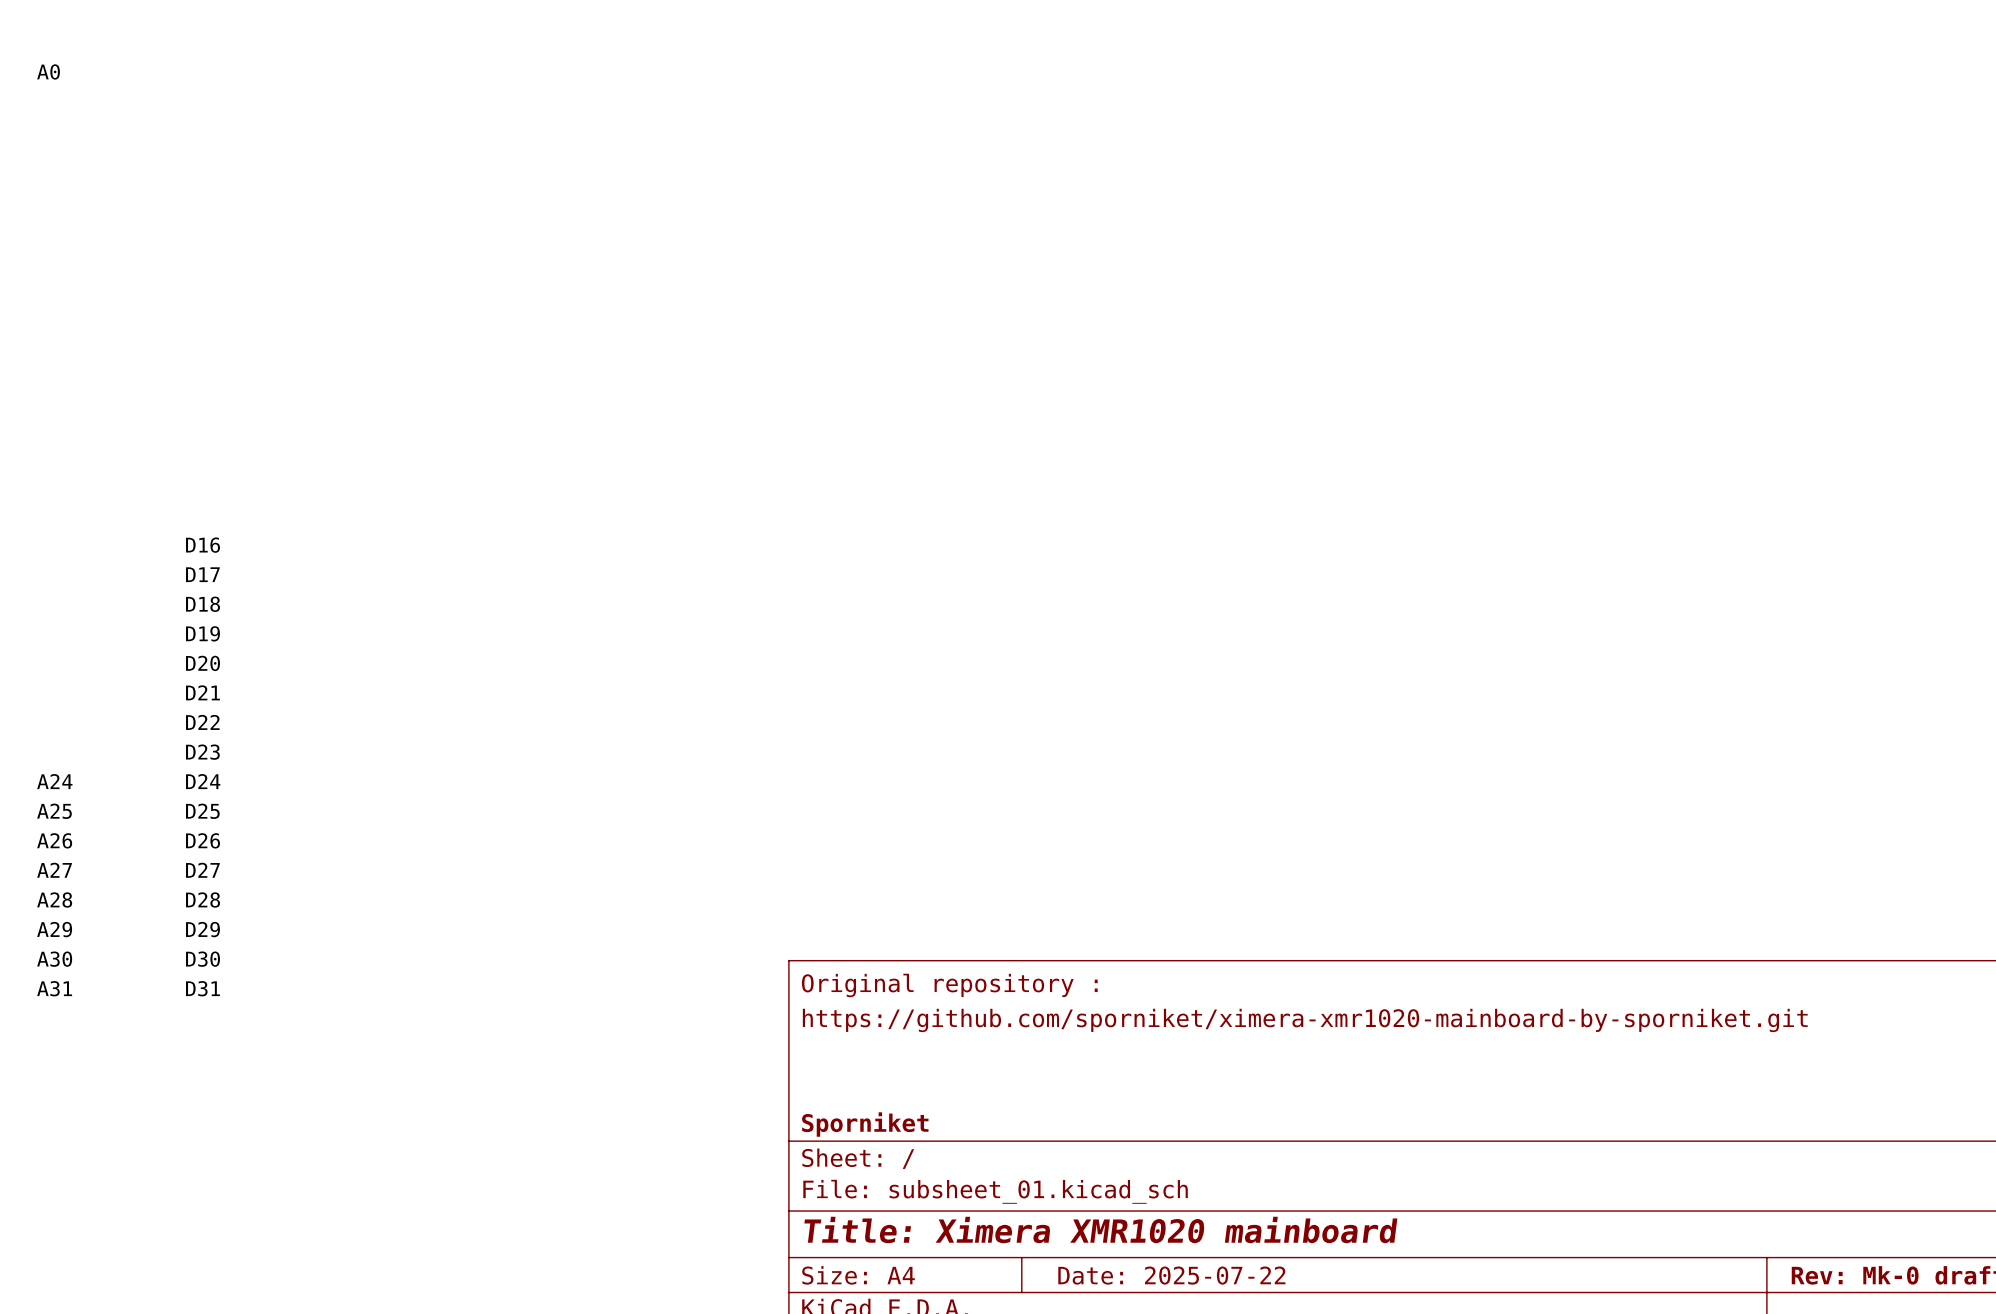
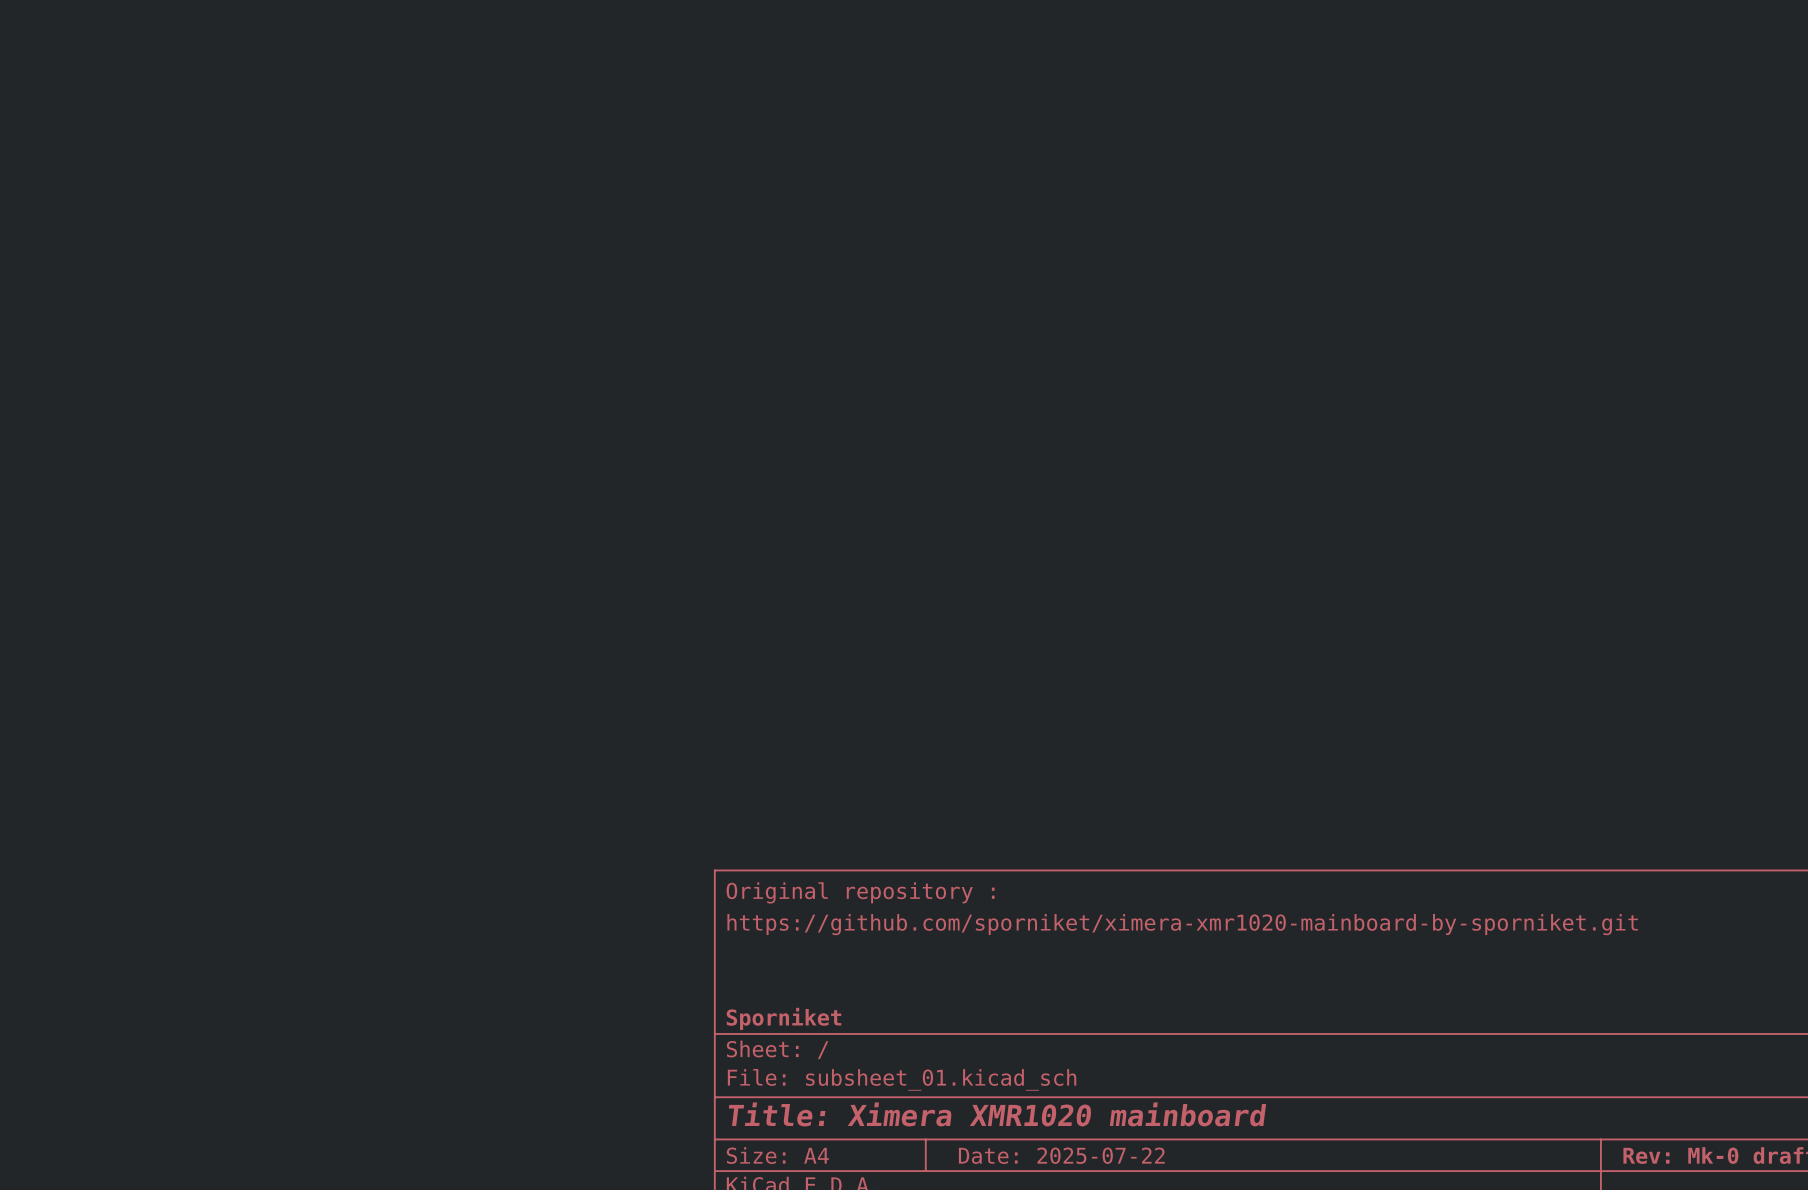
label: A0 (48, 71) -> none
label: D16 (203, 545) -> none
label: D17 (202, 574) -> none
label: D18 (203, 604) -> none
label: D19 (202, 633) -> none
label: D20 (203, 663) -> none
label: D21 (202, 692) -> none
label: D22 (202, 722) -> none
label: D23 (202, 752) -> none
label: A24 (54, 781) -> none
label: D24 (203, 781) -> none
label: A25 (54, 811) -> none
label: D25 (202, 811) -> none
label: A26 (54, 840) -> none
label: D26 (203, 840) -> none
label: A27 (54, 870) -> none
label: D27 (202, 870) -> none
label: A28 (54, 900) -> none
label: D28 (203, 900) -> none
label: A29 (54, 929) -> none
label: D29 (202, 929) -> none
label: A30 (54, 959) -> none
label: D30 (203, 959) -> none
label: A31 (54, 988) -> none
label: D31 (202, 988) -> none

